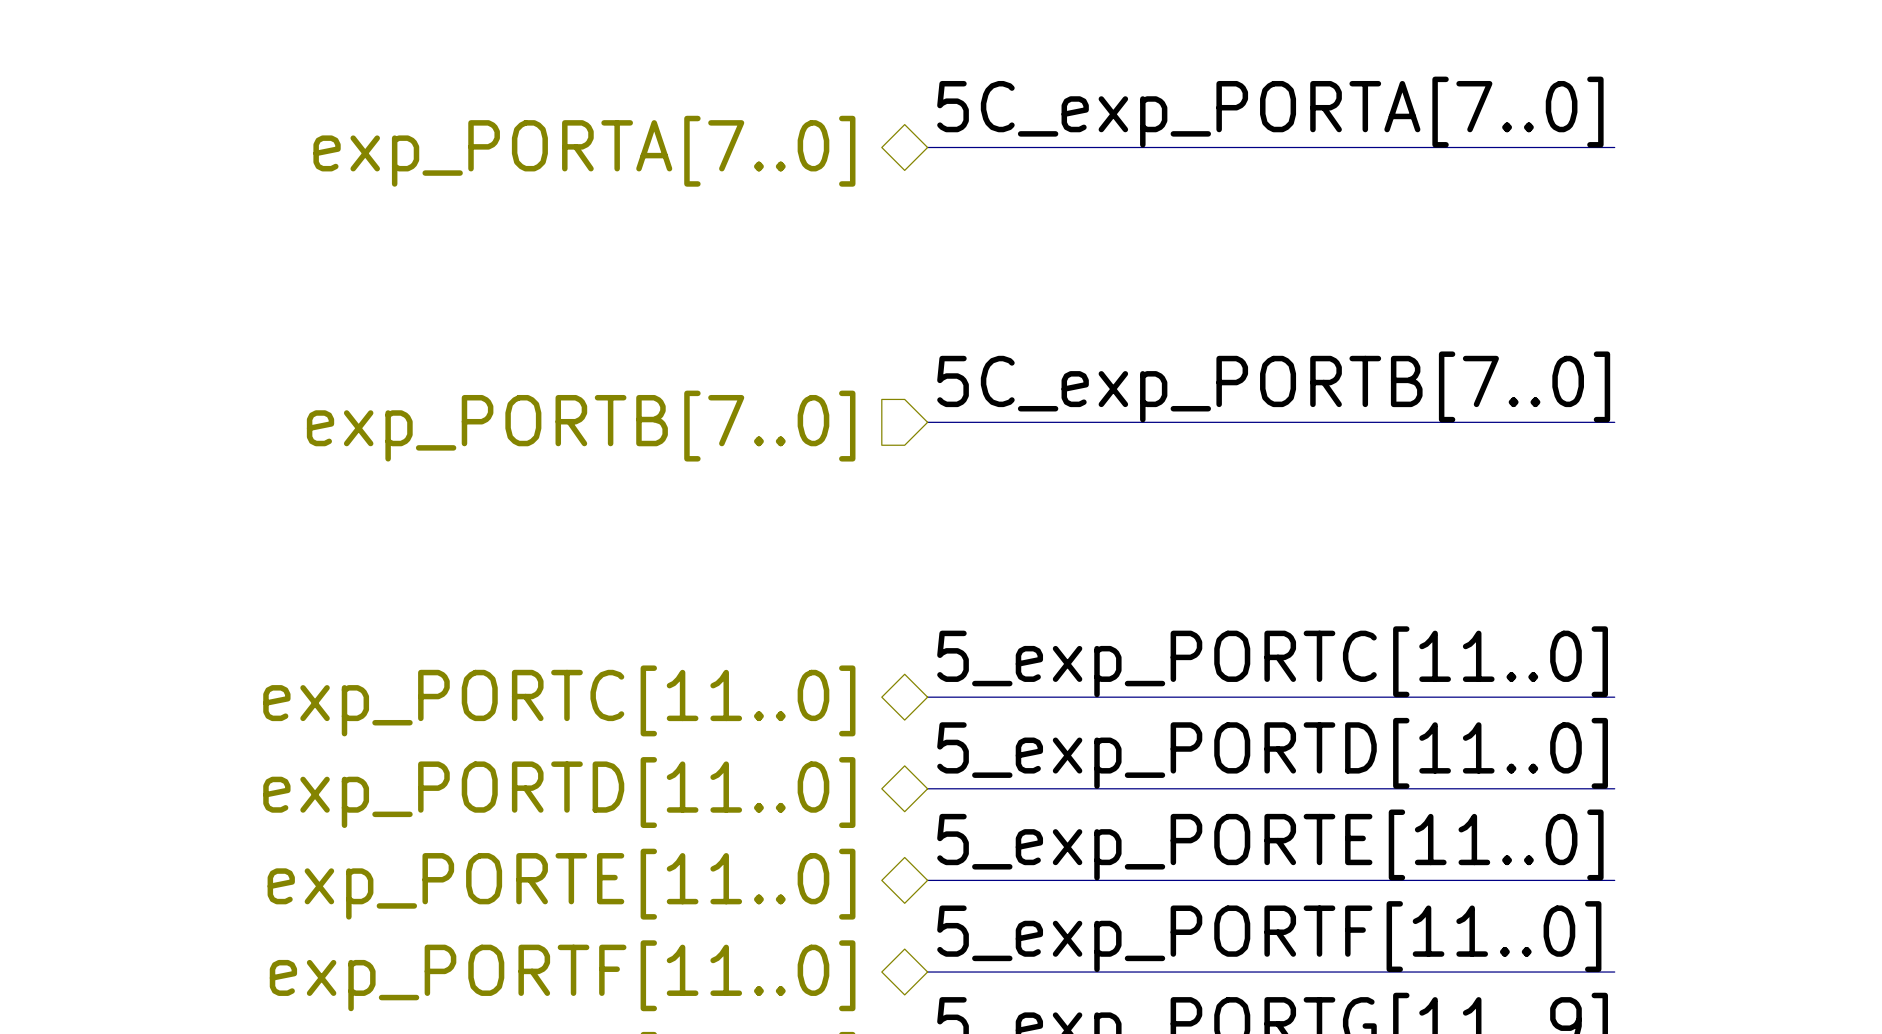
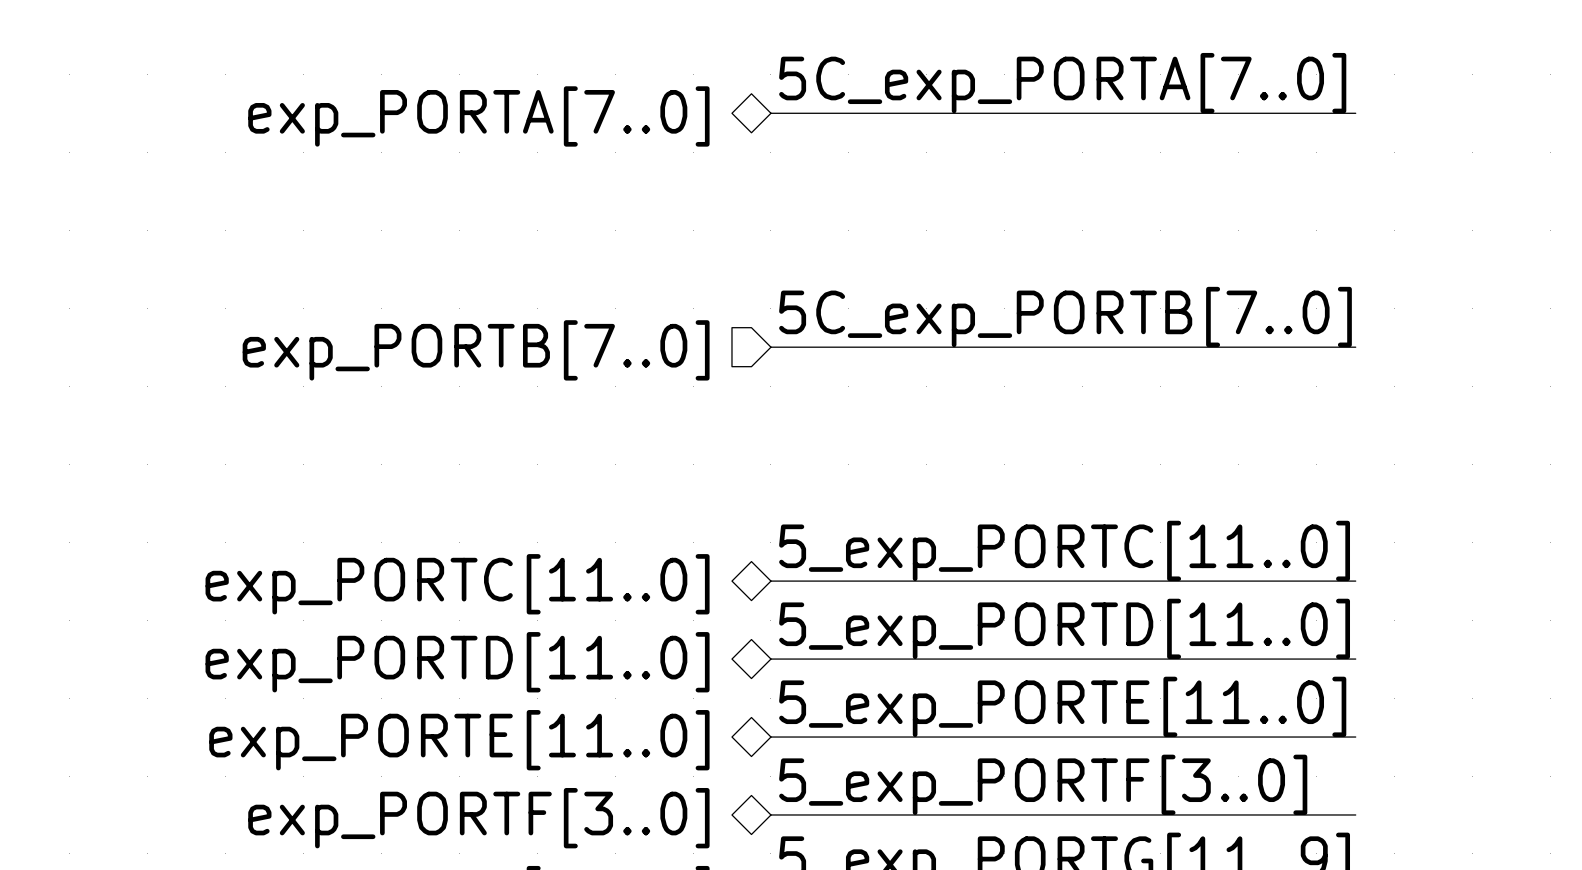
label: 5_exp_PORTF[11..0] (1269, 936) -> 5_exp_PORTF[3..0] (1043, 784)
hierarchical label: exp_PORTF[11..0] (562, 975) -> exp_PORTF[3..0] (478, 818)

